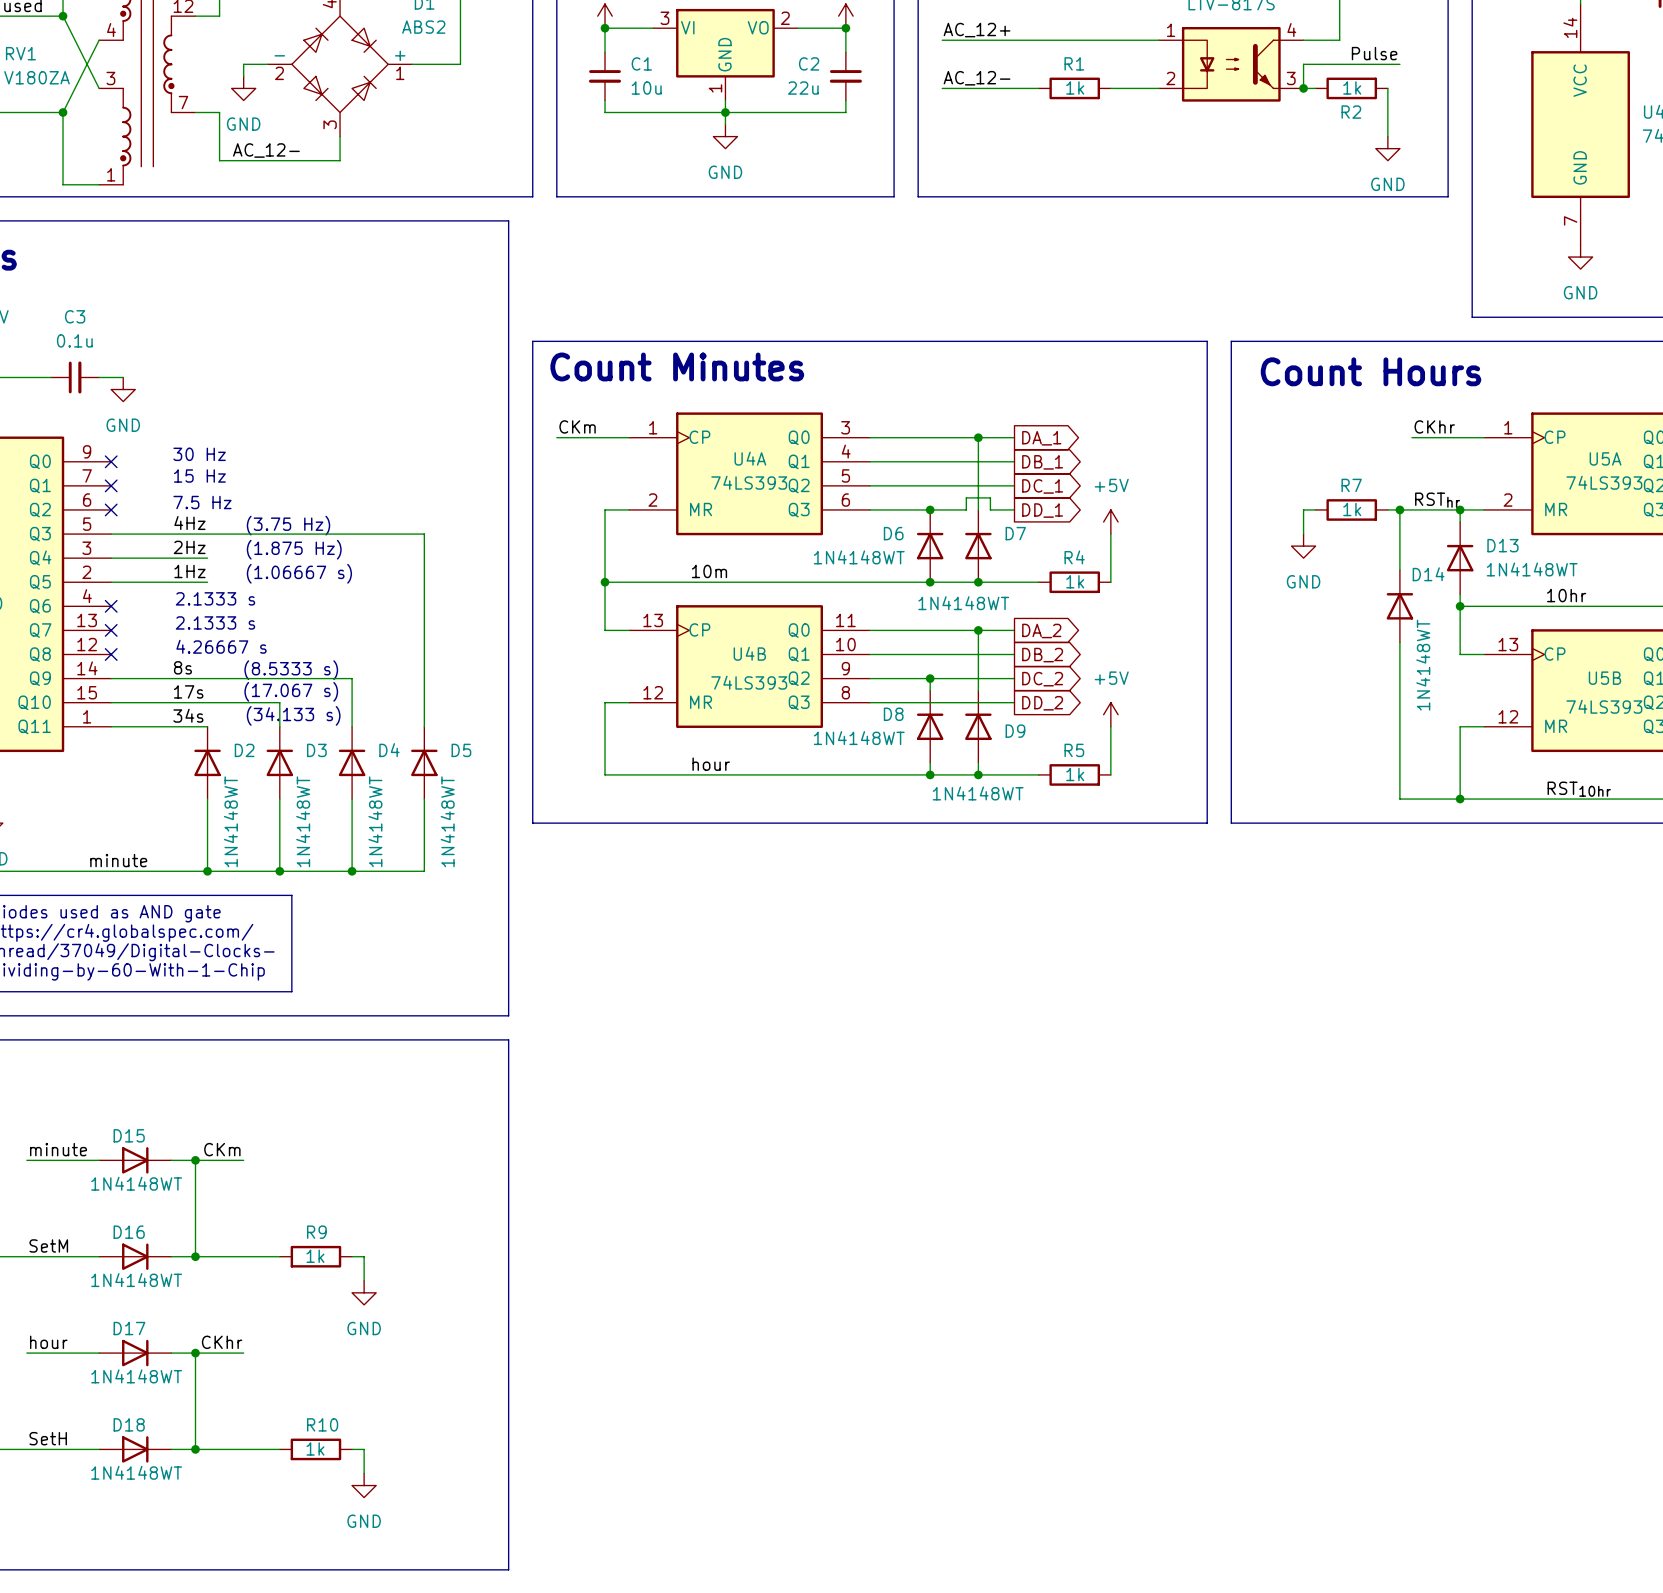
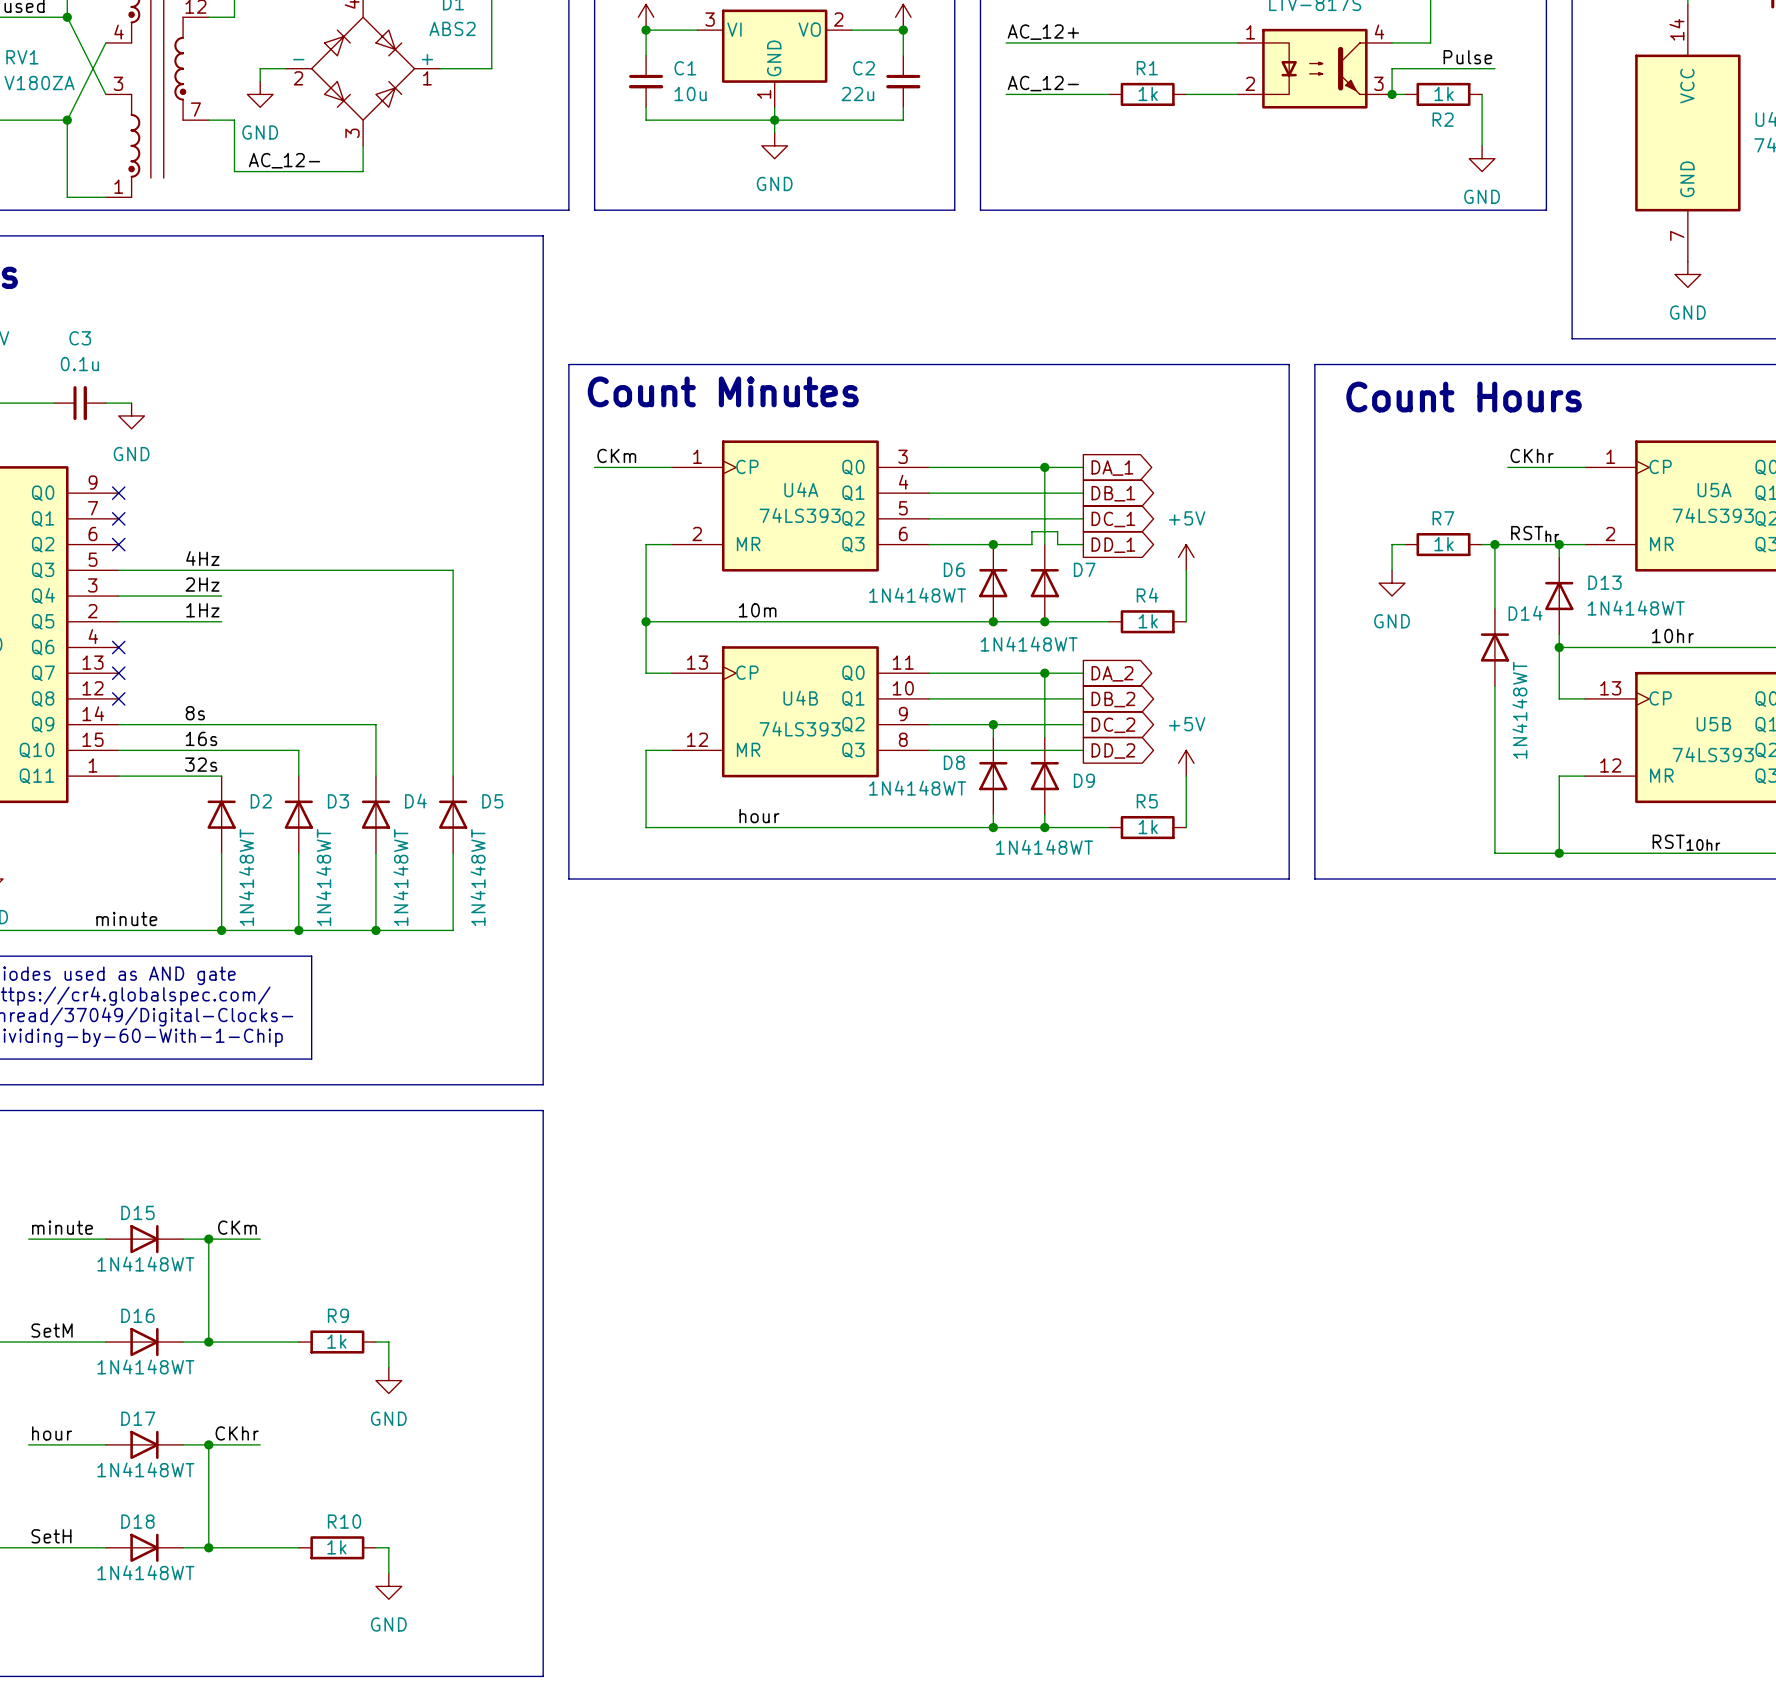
text: 30 Hz (199, 454) -> none
text: 15 Hz (199, 476) -> none
text: 7.5 Hz (202, 502) -> none
text: (3.75 Hz) (288, 525) -> none
text: (1.875 Hz) (294, 549) -> none
text: (1.06667 s) (299, 573) -> none
text: 2.1333 s (215, 598) -> none
text: 2.1333 s (215, 622) -> none
text: 4.26667 s (221, 646) -> none
text: (8.5333 s) (291, 670) -> none
label: 17s (188, 691) -> 16s (201, 738)
text: (17.067 s) (291, 691) -> none
label: 34s (188, 715) -> 32s (201, 764)
text: (34.133 s) (293, 715) -> none

